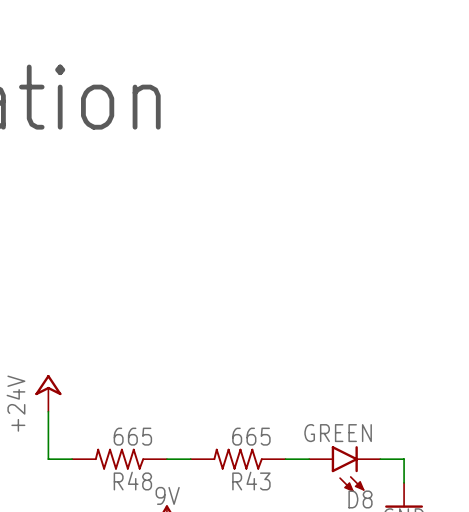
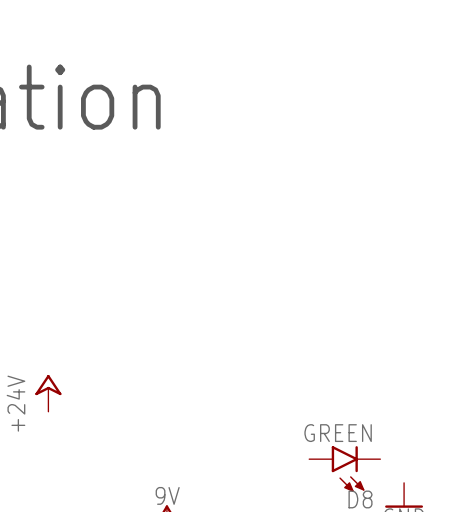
wire: (48, 411) (48, 459) (72, 459) -> none
R48: 665 (119, 459) -> none
wire: (166, 459) (190, 459) -> none
R43: 665 (238, 459) -> none
wire: (285, 459) (309, 459) -> none
wire: (380, 459) (404, 459) (404, 482) -> none

